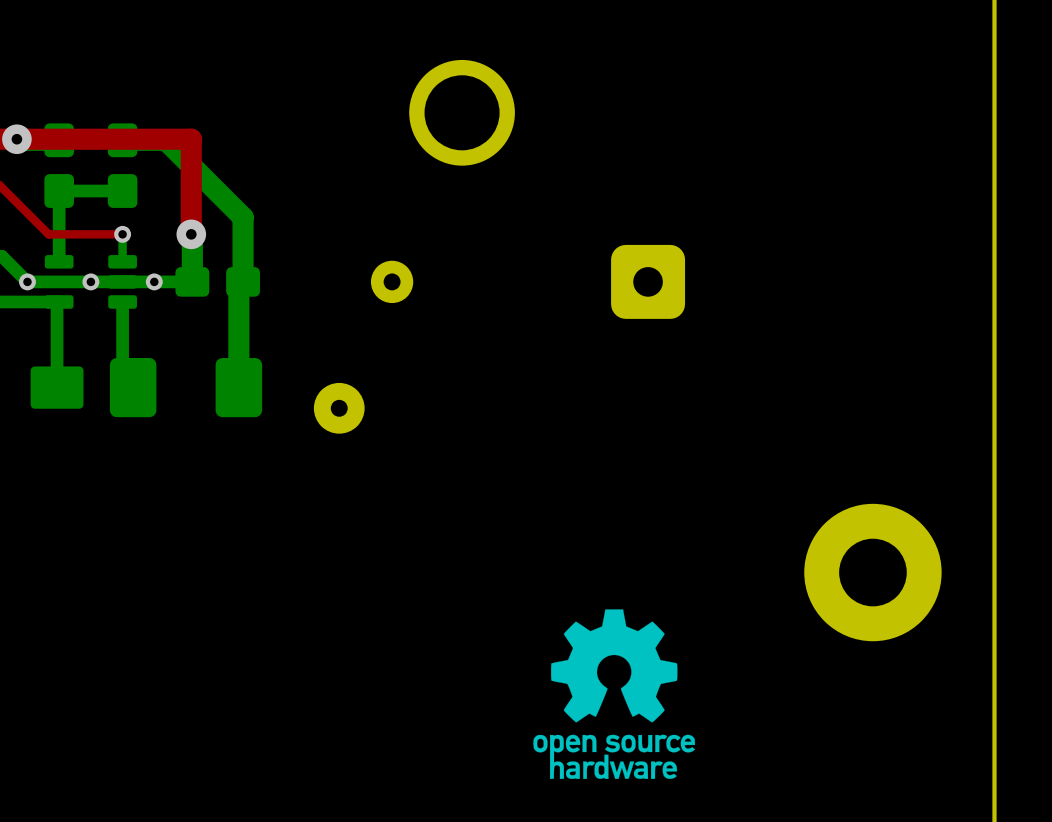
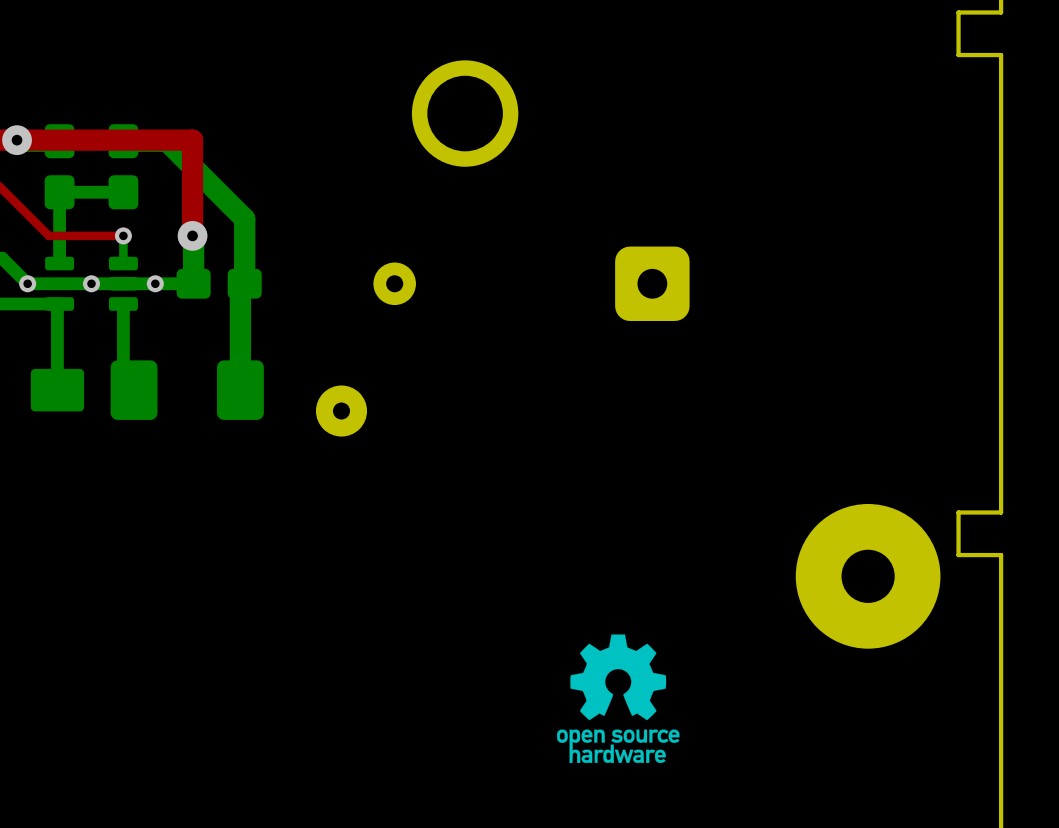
board edge: (994, 12) (994, 54) -> (1001, 12) (958, 12) (958, 55) (1001, 55)
part footprint: [804, 503, 942, 642] -> [795, 503, 941, 649]
board edge: (994, 509) (994, 551) -> (1001, 512) (958, 512) (958, 555) (1001, 555)
drawing shape: [533, 609, 696, 779] -> [557, 634, 680, 764]

